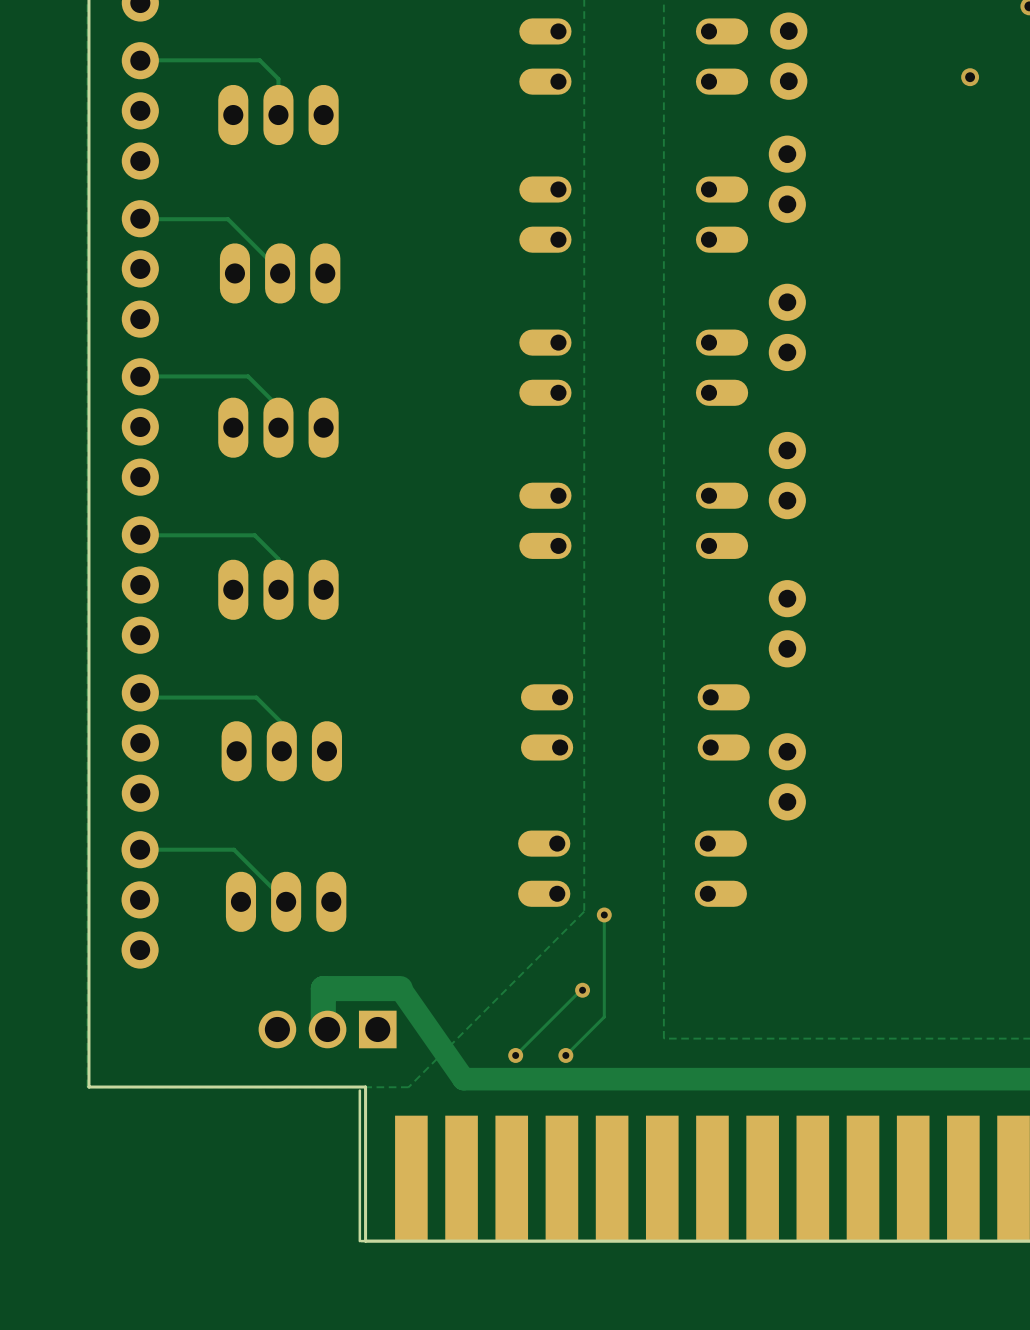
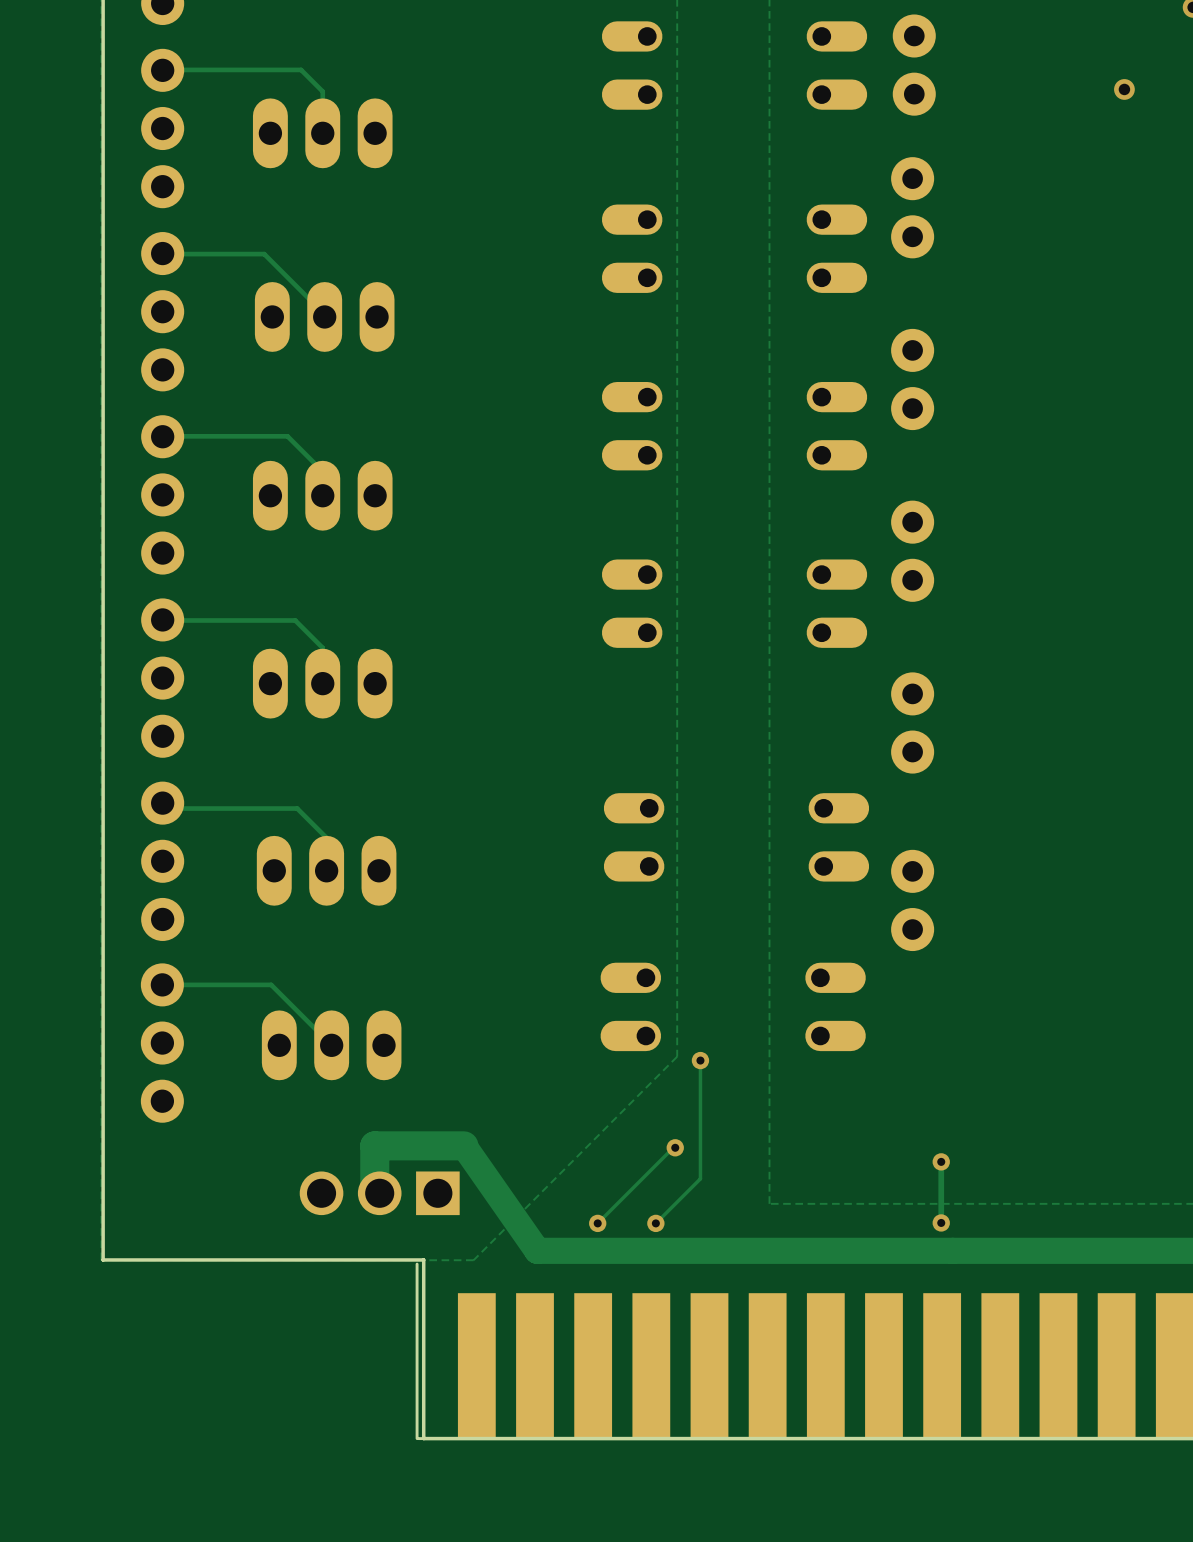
track: none -> (941, 1161) (941, 1222)
via: none -> (941, 1161)
via: none -> (941, 1222)

